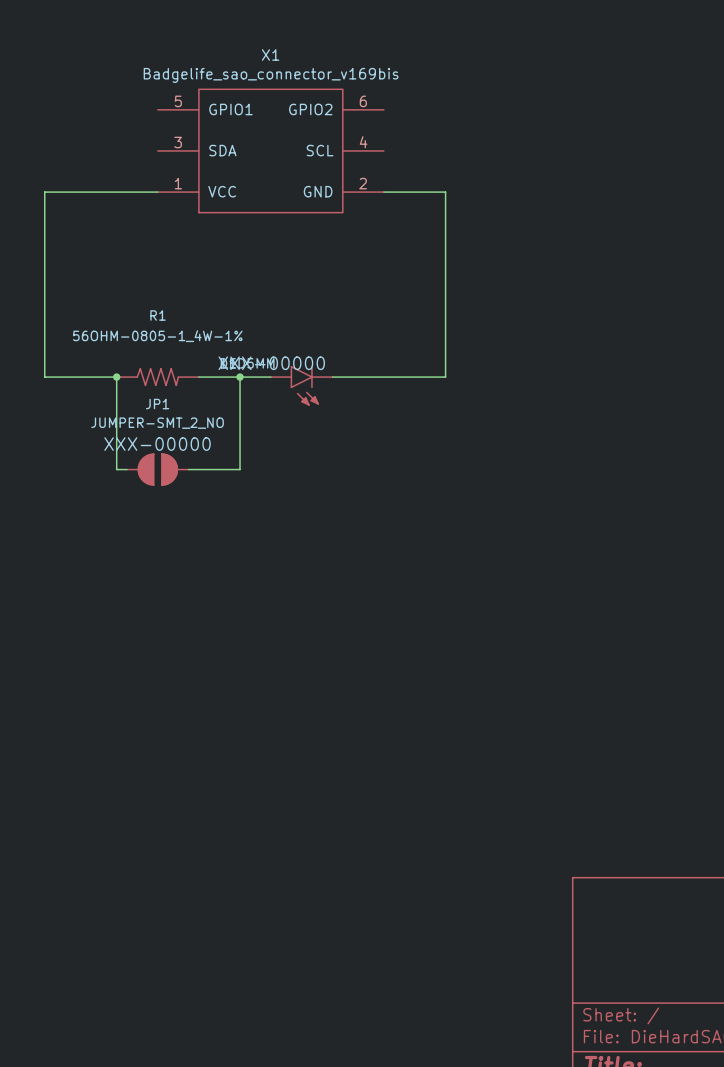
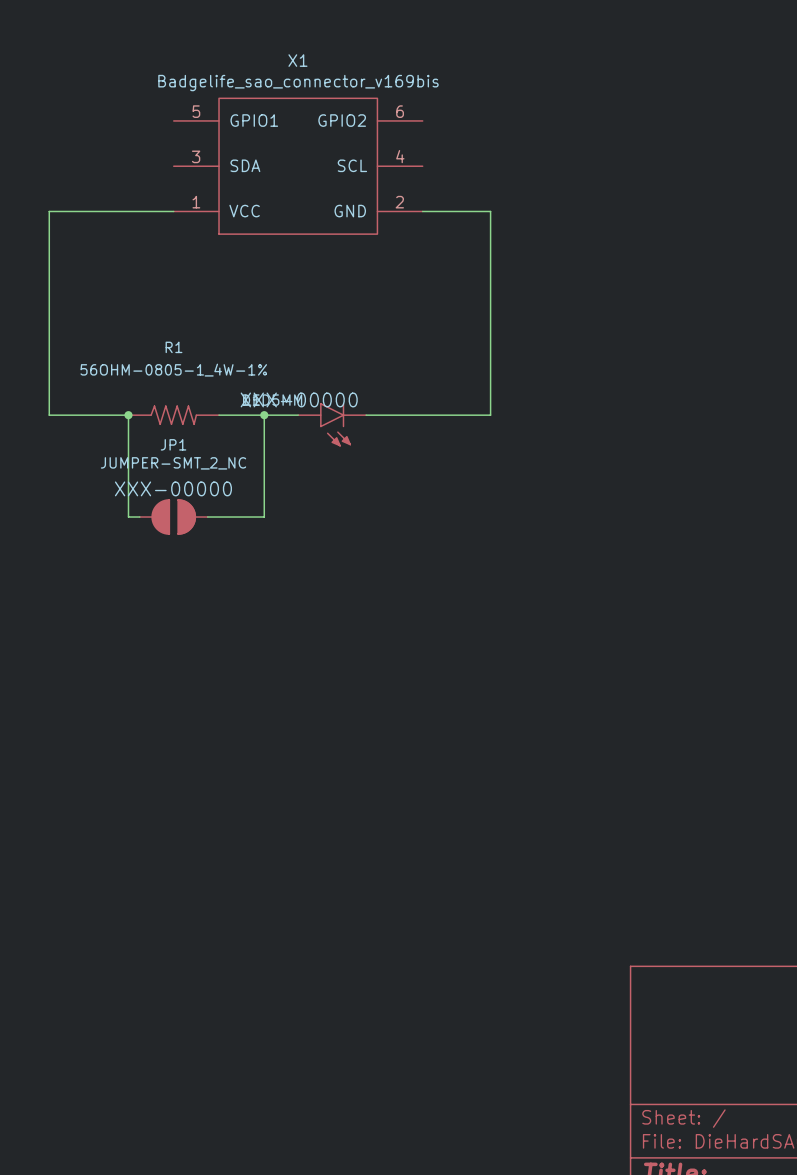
JP1 value: JUMPER-SMT_2_NO (157, 423) -> JUMPER-SMT_2_NC (173, 463)

